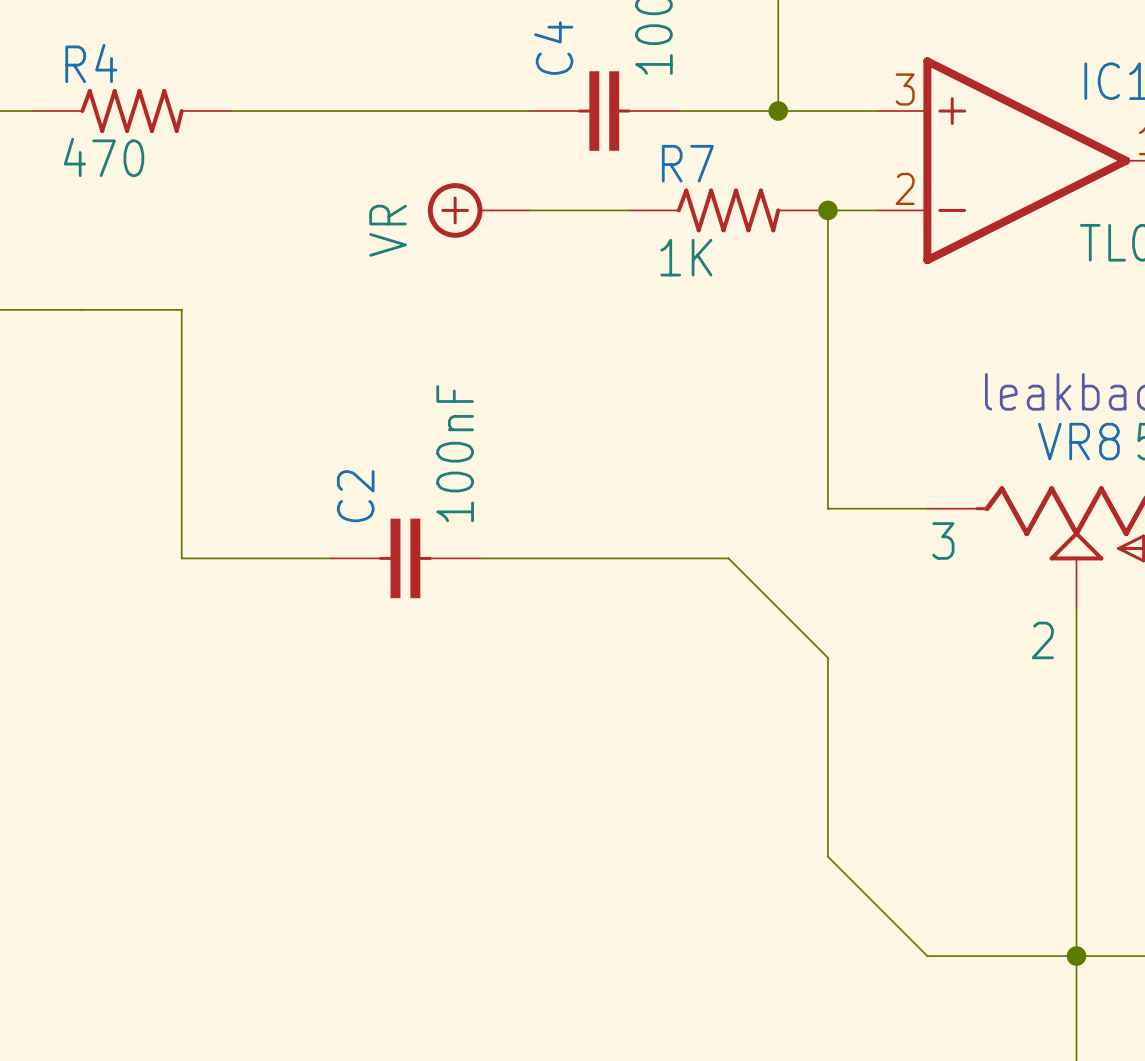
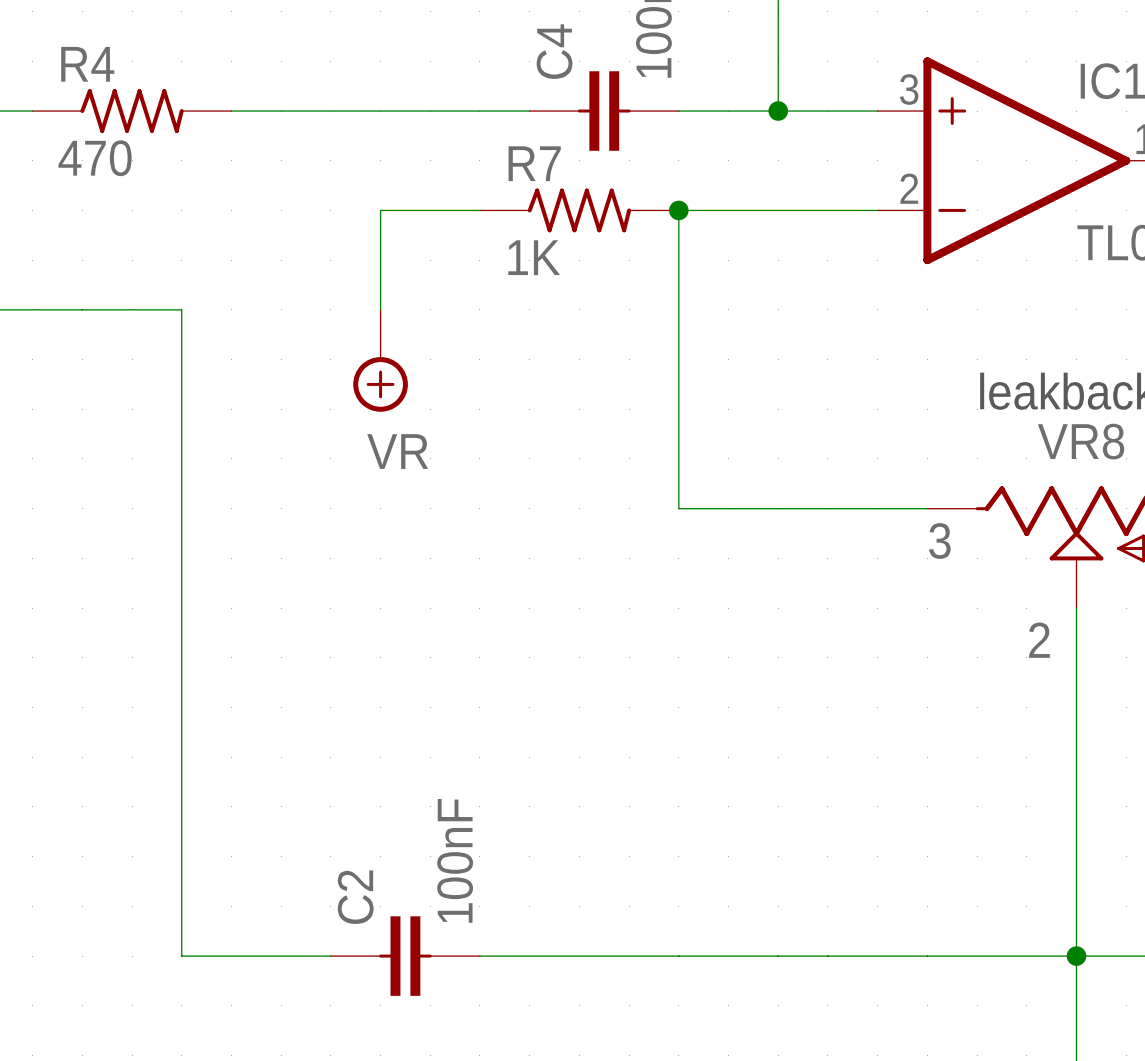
power symbol rotation: 0° (455, 210) -> 90° counterclockwise (380, 384)
power symbol position: VR (478, 210) -> VR (380, 360)
wire: none -> (479, 210) (380, 210) (380, 309)
wire: (529, 210) (629, 210) -> none
junction: none -> (678, 210)
R7 position: (728, 210) -> (579, 210)
wire: (827, 210) (827, 508) -> (827, 210) (678, 210) (678, 508) (827, 508)
junction: (827, 210) -> none
wire: (181, 558) (330, 558) -> (181, 558) (181, 956) (330, 956)
C2 position: (405, 558) -> (405, 956)
wire: (479, 558) (728, 558) (827, 657) (827, 856) (927, 956) -> (479, 956) (927, 956)

